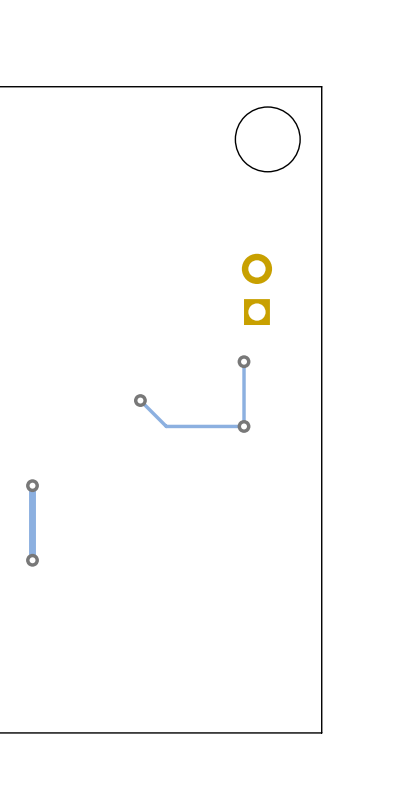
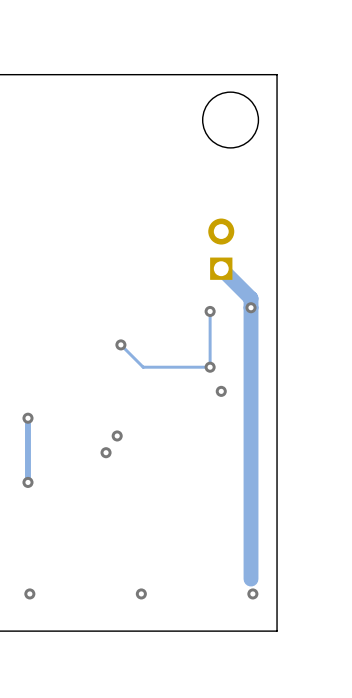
track: none -> (221, 268) (251, 298) (251, 579)
via: none -> (251, 307)
via: none -> (221, 391)
via: none -> (117, 435)
via: none -> (106, 452)
via: none -> (29, 593)
via: none -> (141, 593)
via: none -> (252, 593)

